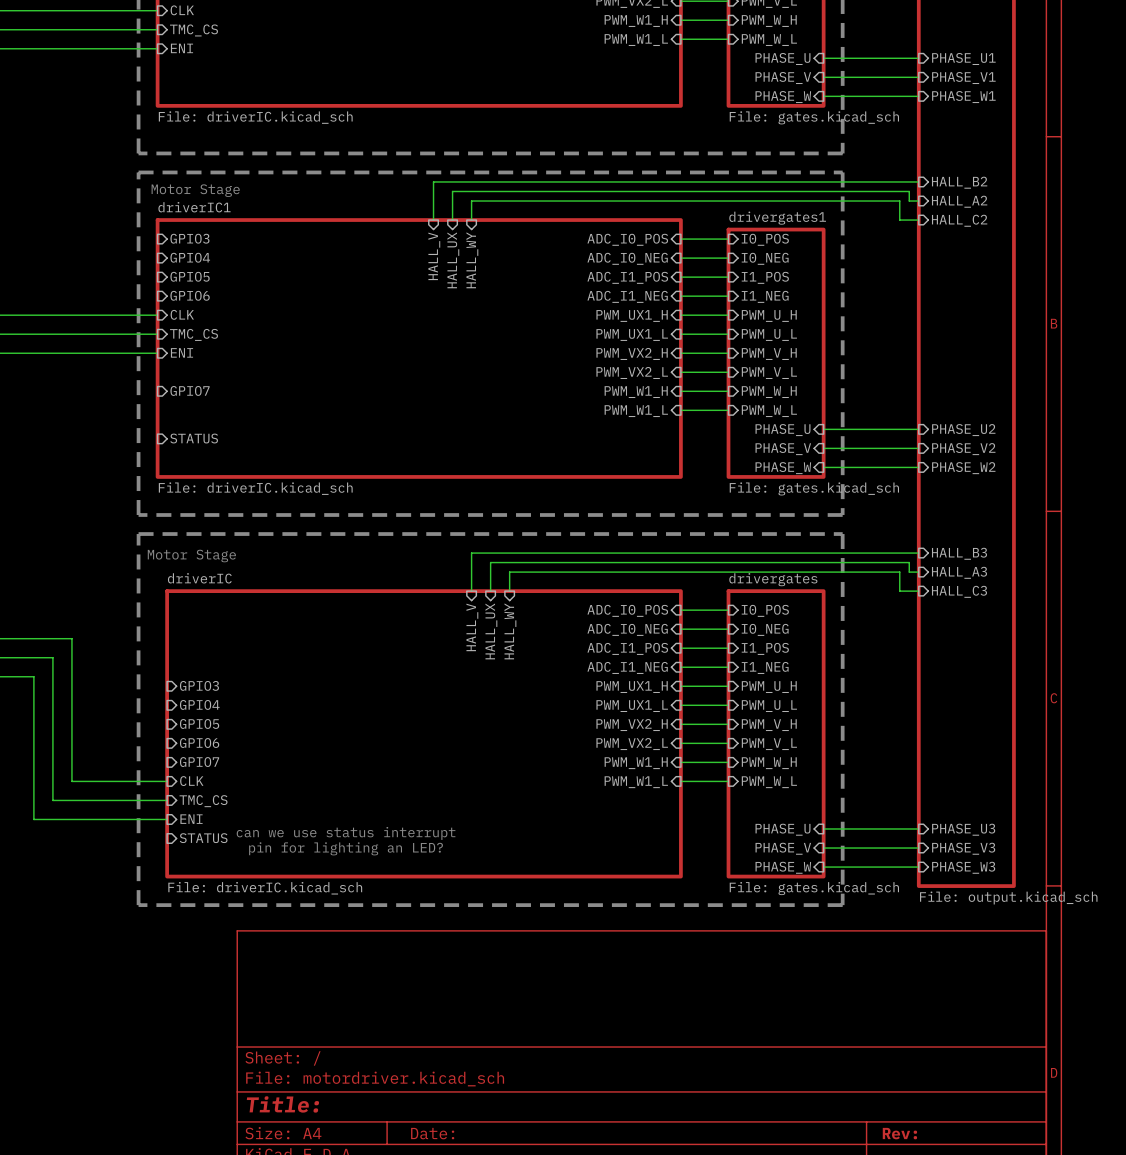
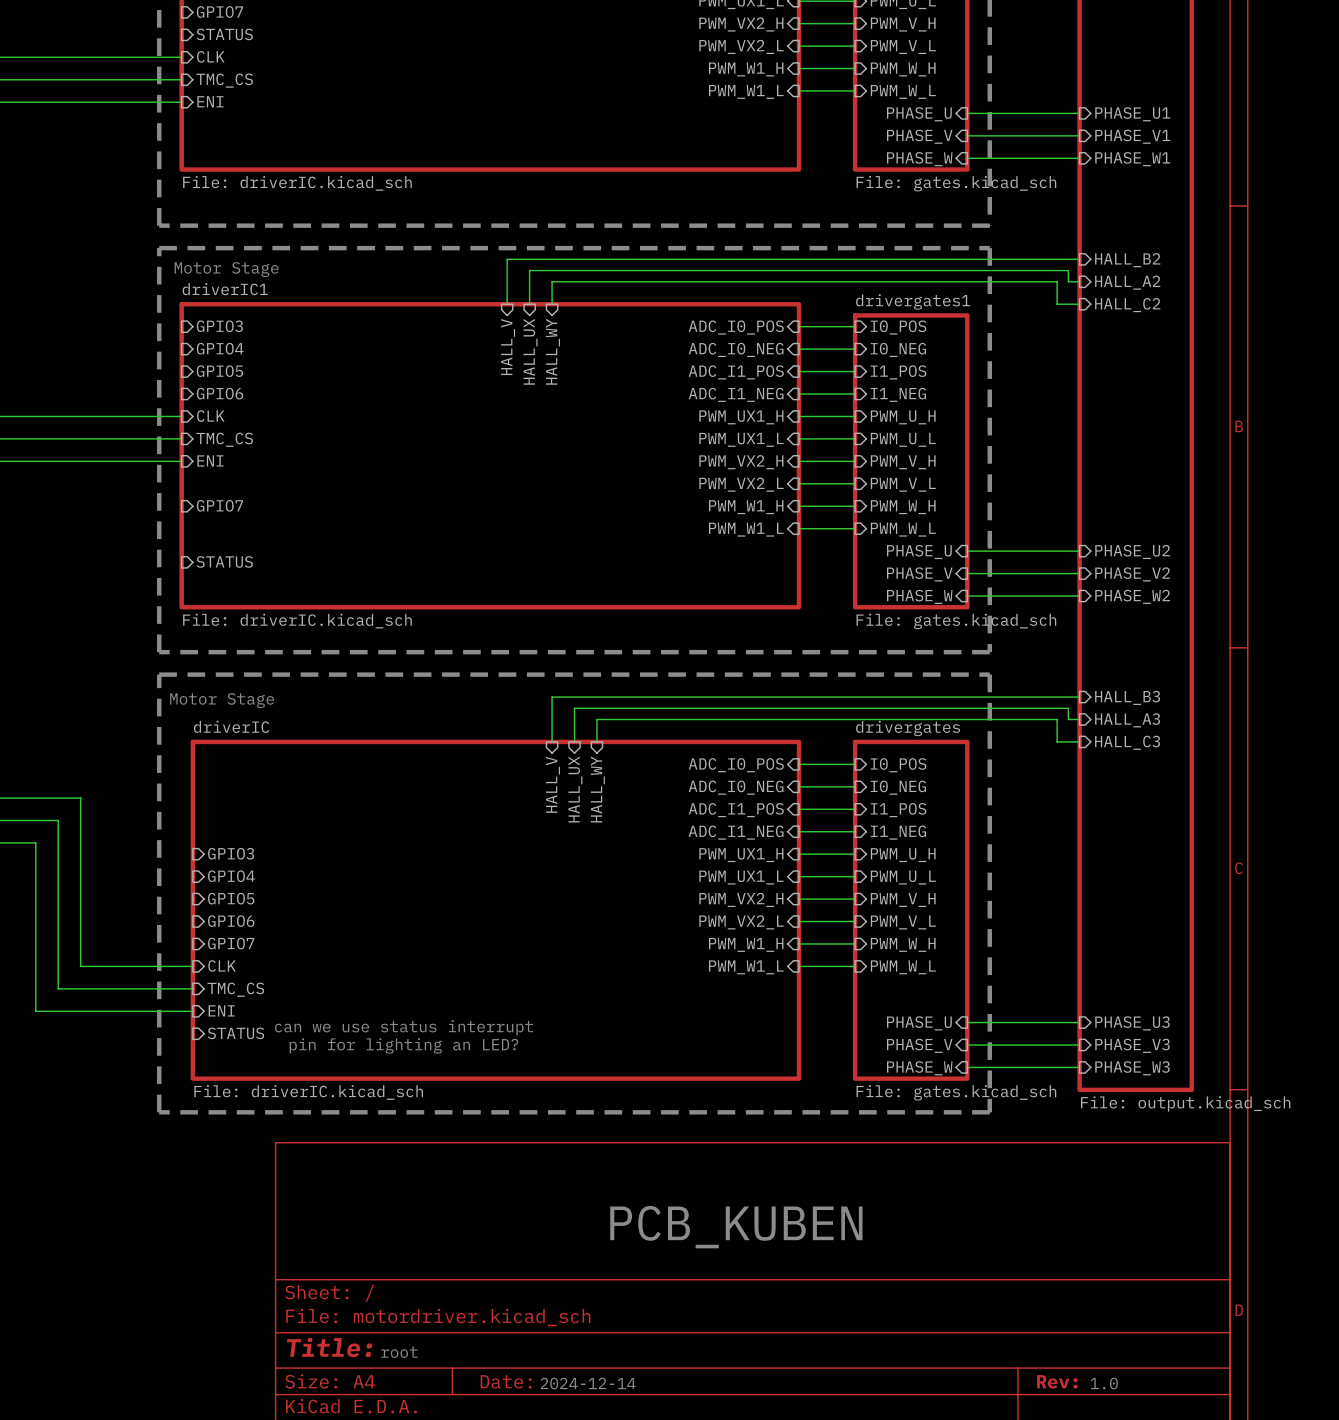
text: none -> PCB_KUBEN (736, 1227)
text: none -> root (399, 1352)
text: none -> 2024-12-14 (588, 1383)
text: none -> 1.0 (1104, 1383)

